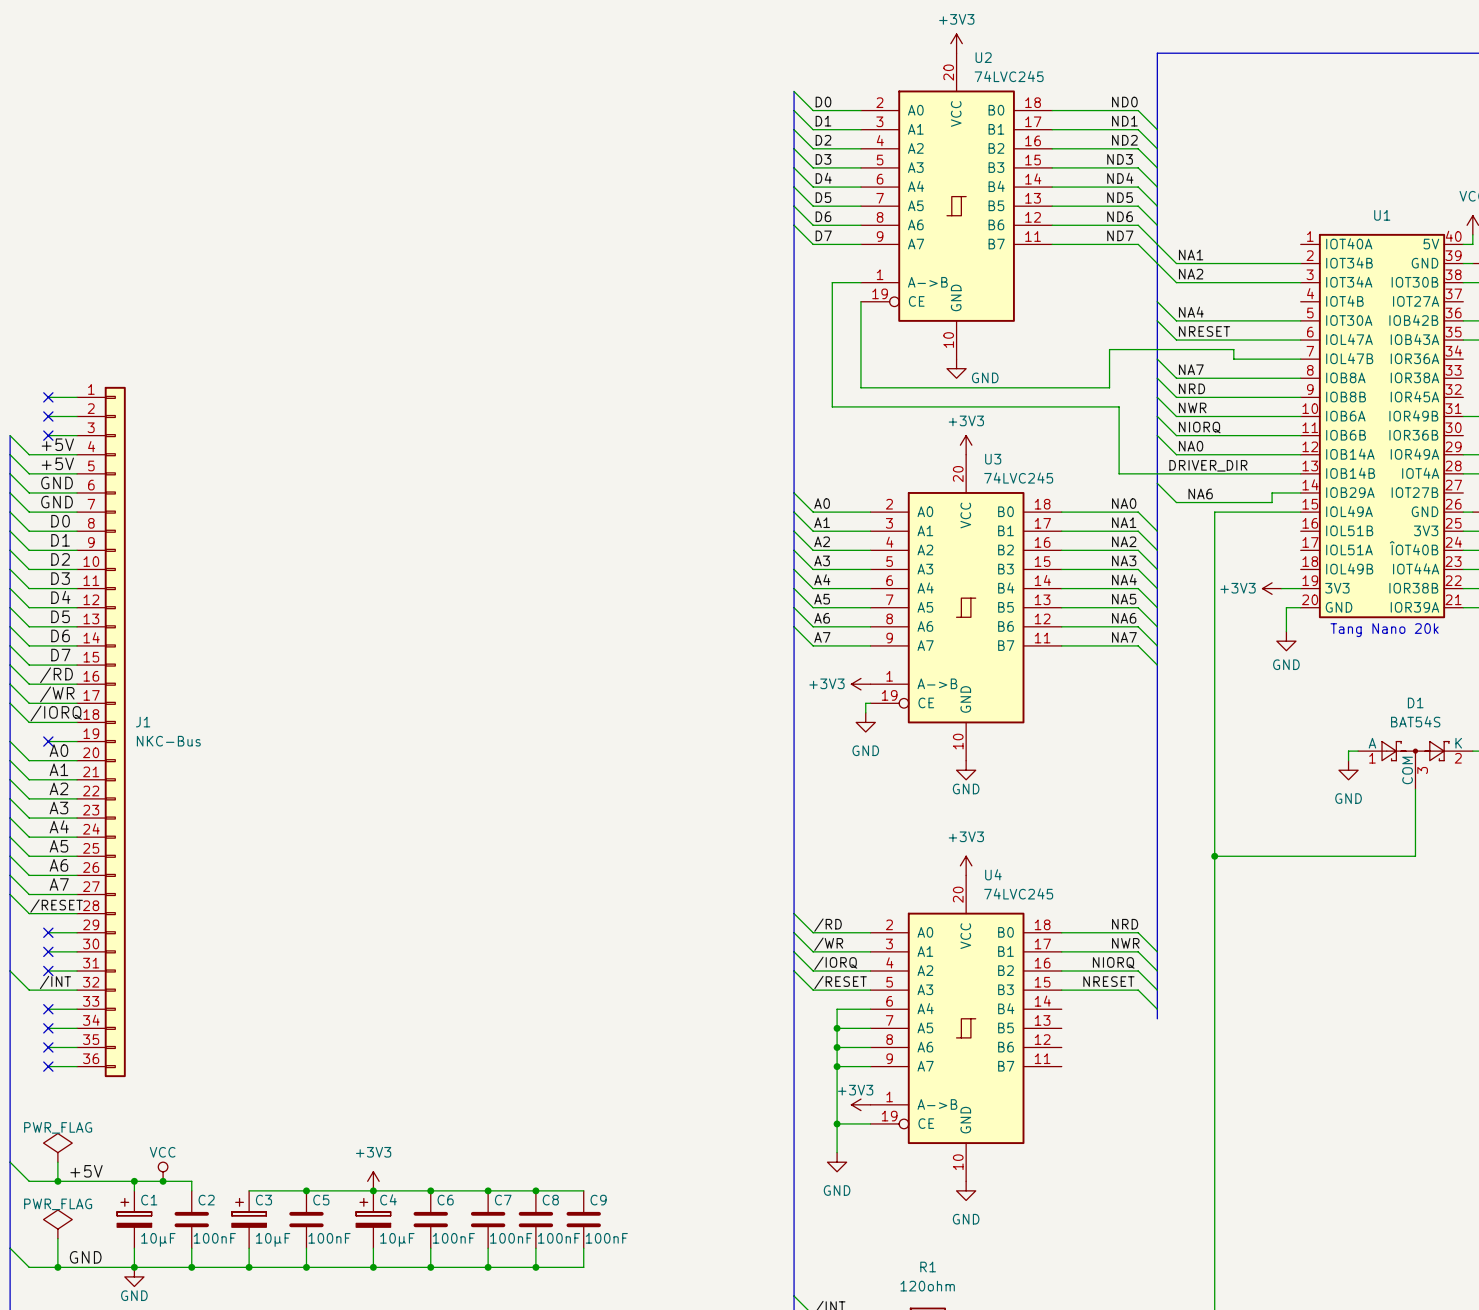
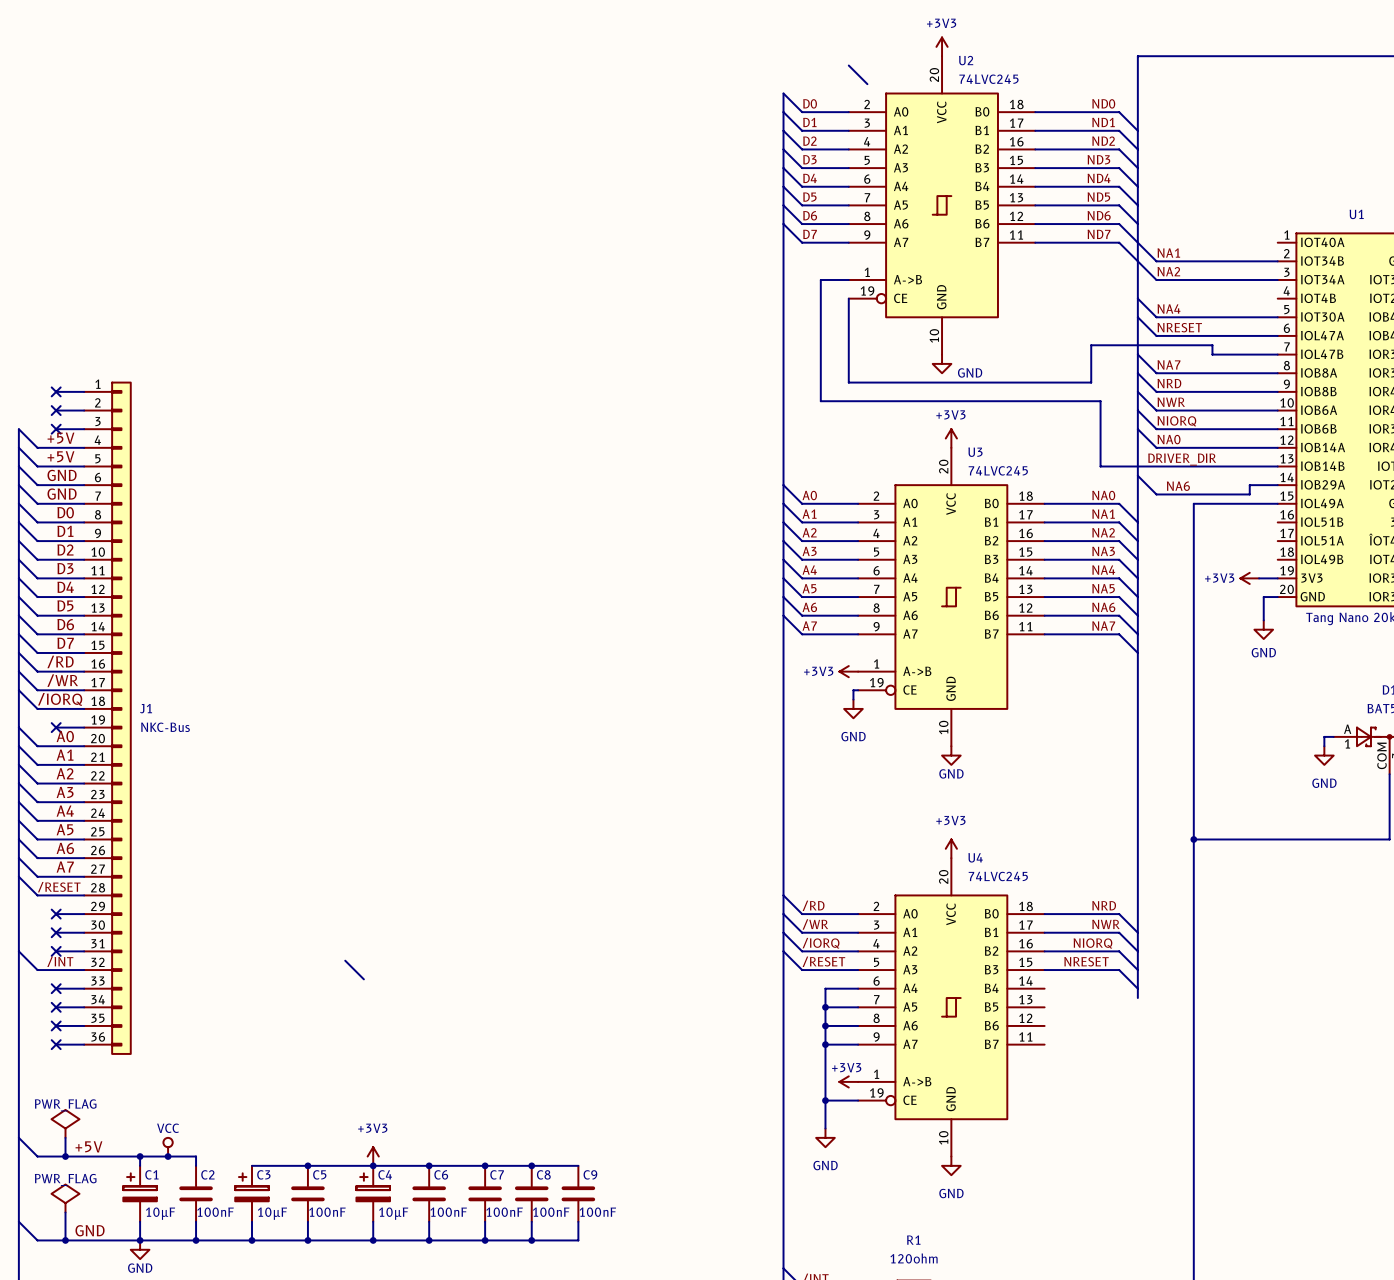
wire: none -> (848, 65) (867, 84)
wire: none -> (345, 960) (363, 979)

